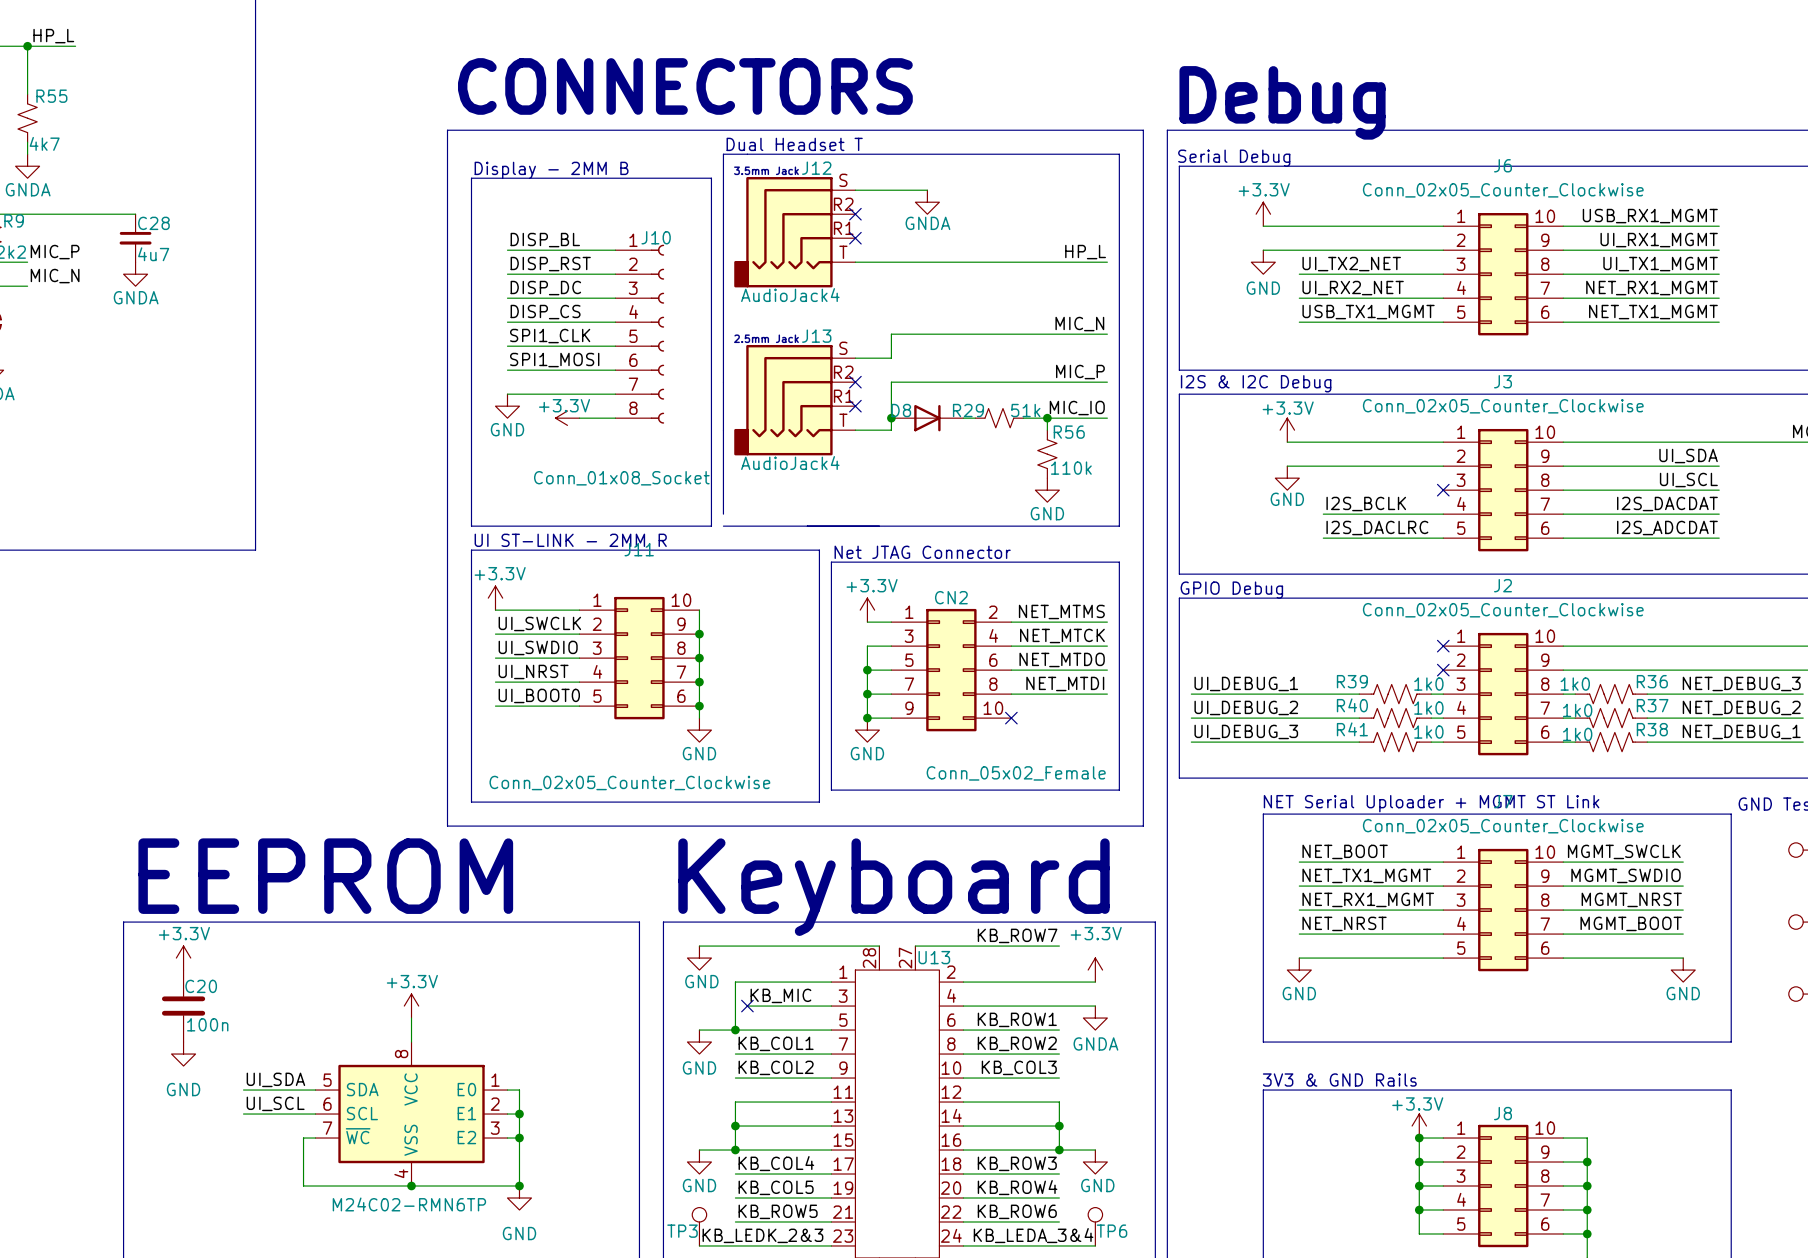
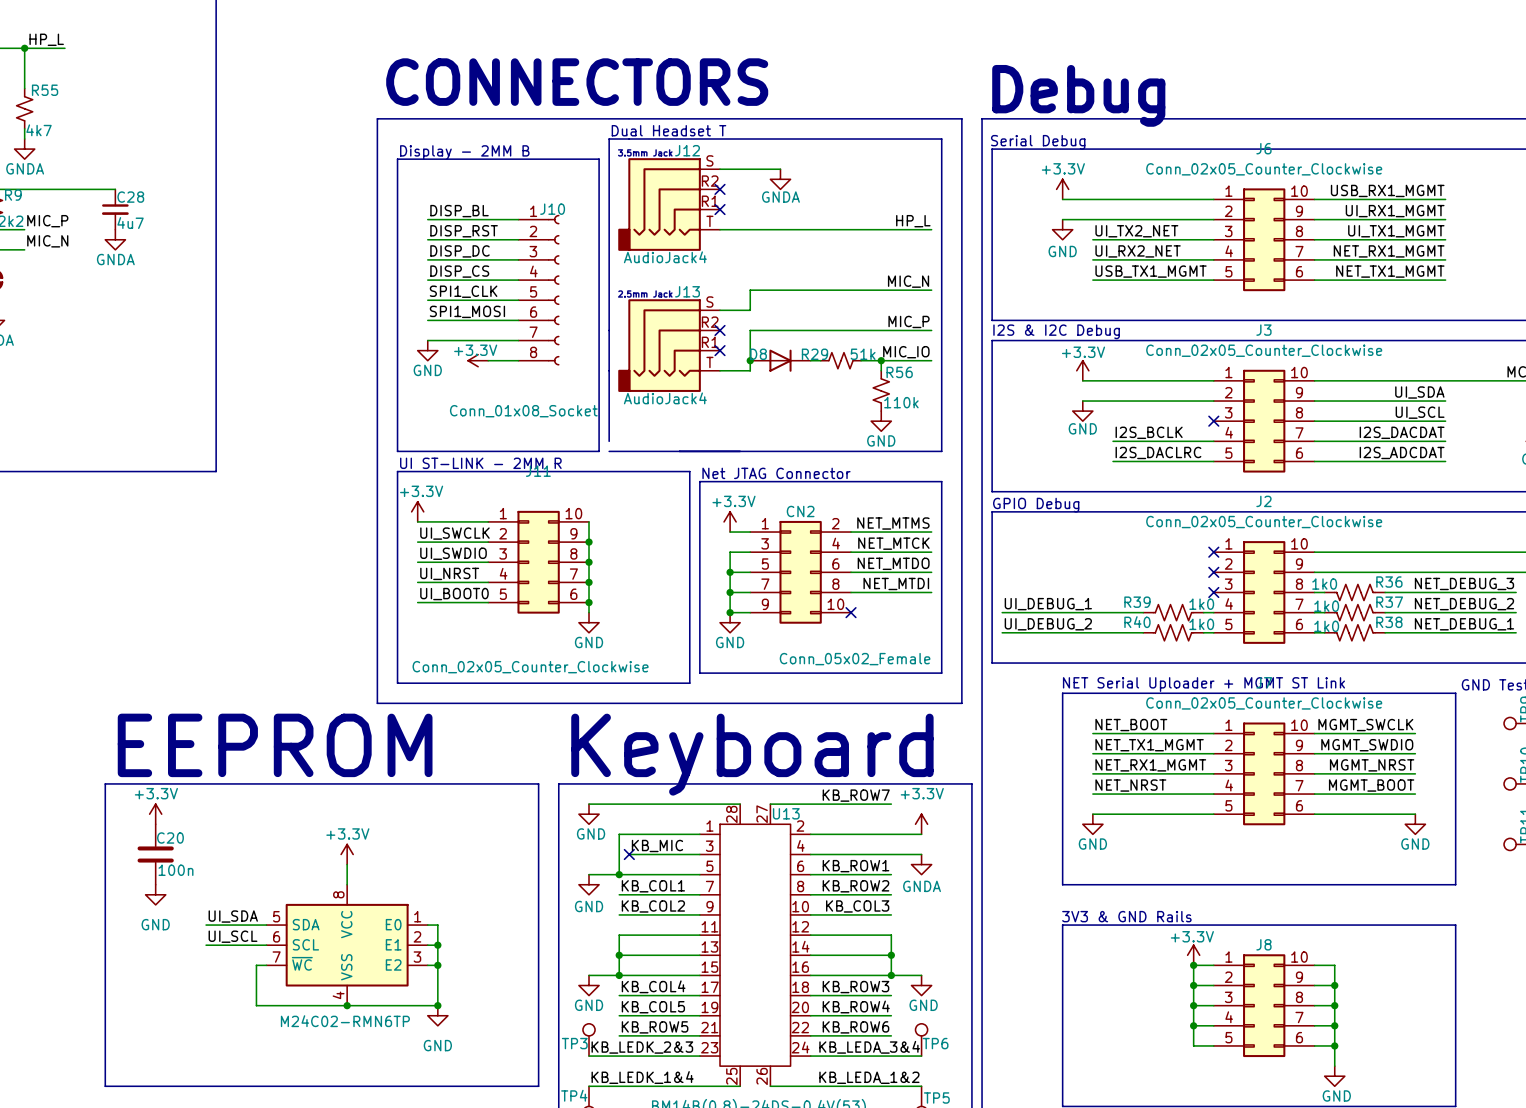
label: UI_DEBUG_1 (1246, 683) -> none
wire: (1191, 694) (1359, 694) -> none
R39: 1k0 (1395, 694) -> none
wire: (1431, 694) (1443, 694) -> none
no-connect mark: none -> (1213, 592)
R40 name: R40 (1352, 705) -> R39 (1137, 602)
label: UI_DEBUG_2 (1246, 707) -> UI_DEBUG_1 (1048, 604)
R41 name: R41 (1352, 729) -> R40 (1137, 622)
label: UI_DEBUG_3 (1246, 731) -> UI_DEBUG_2 (1048, 624)

